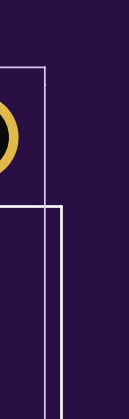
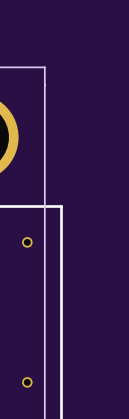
part: none -> (27, 242)
part: none -> (27, 382)

